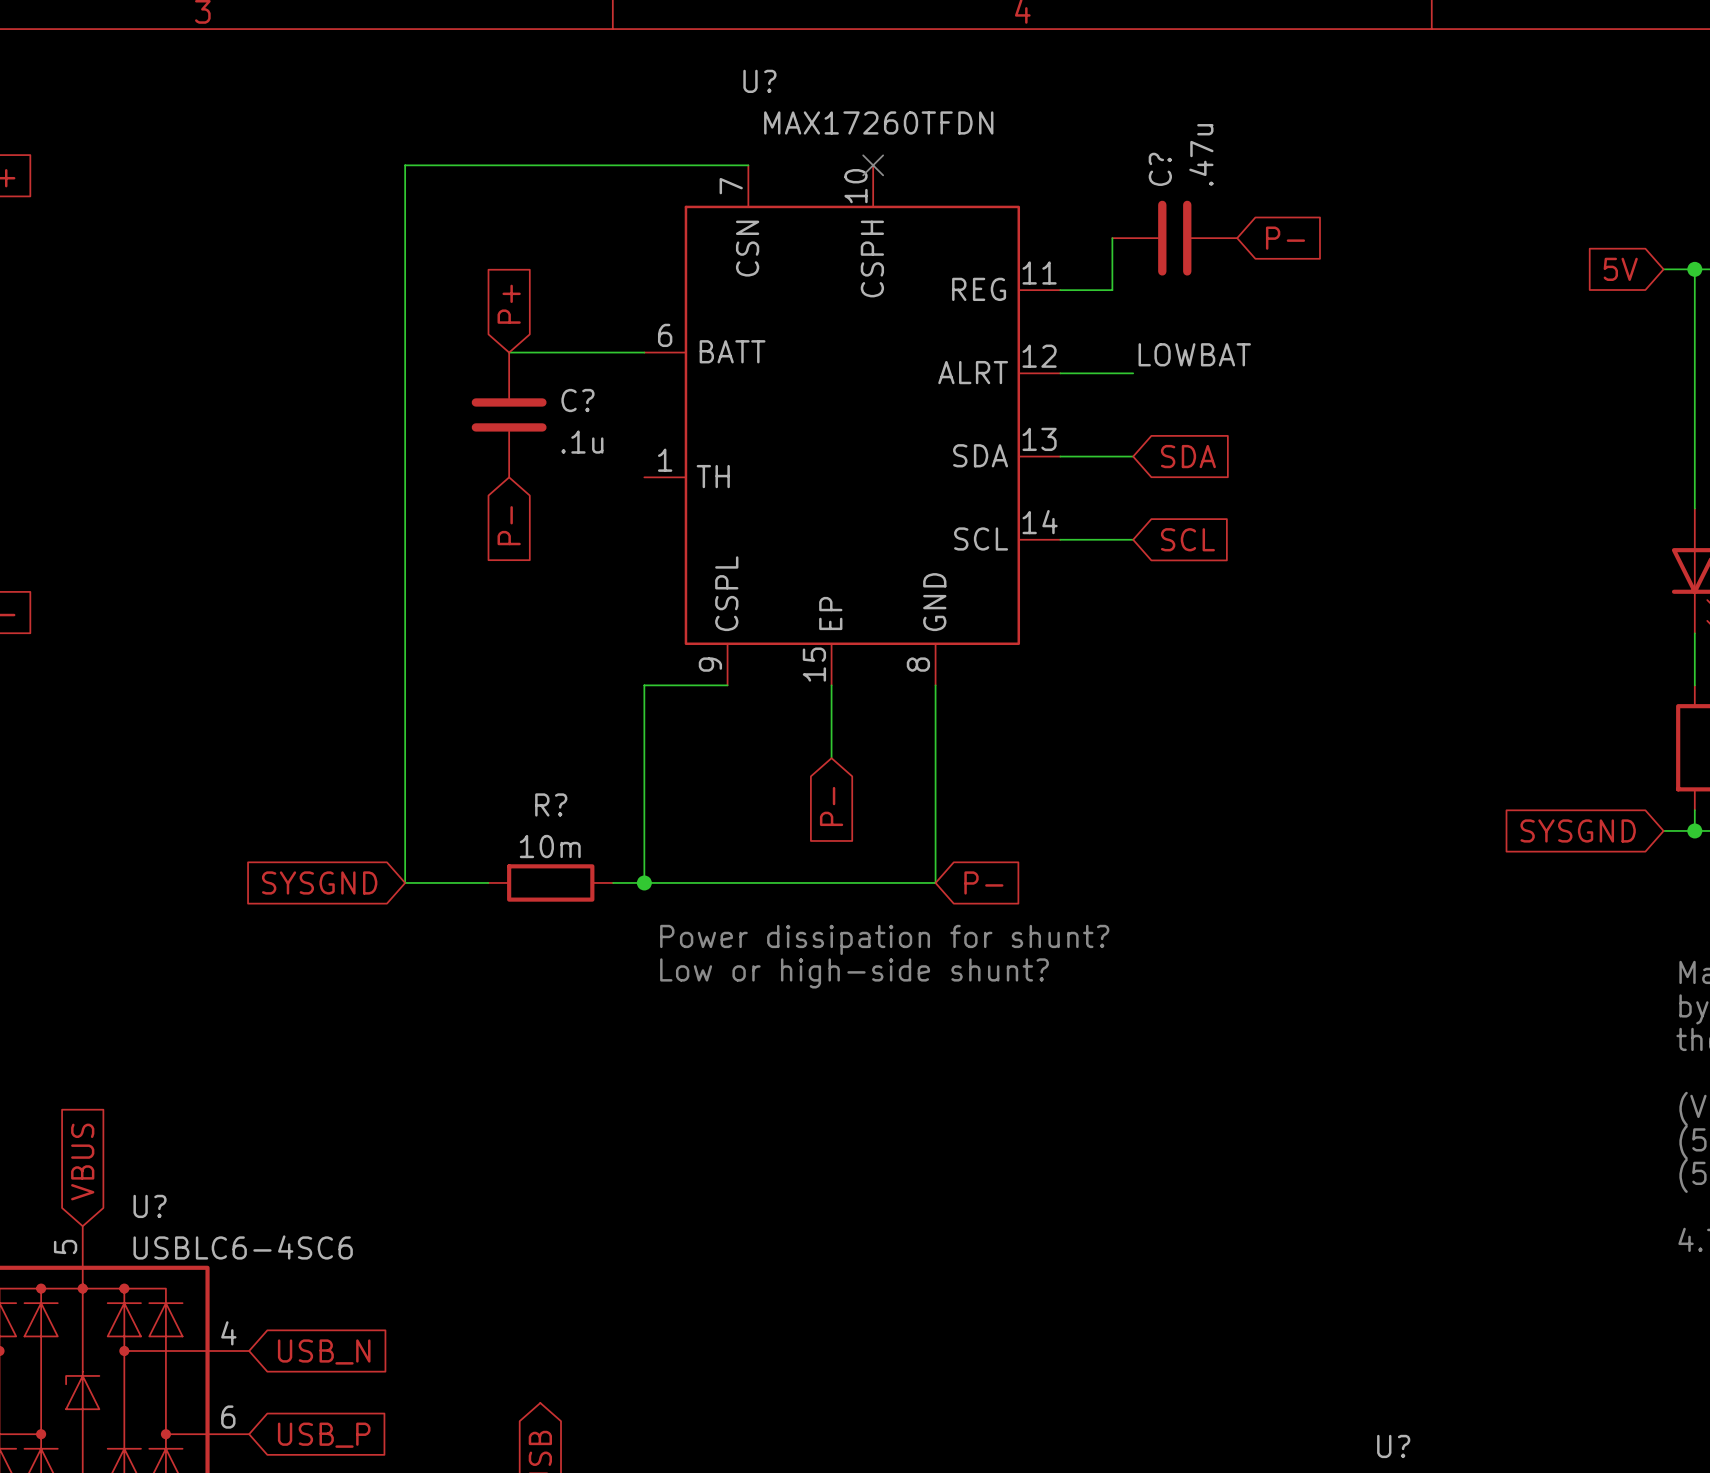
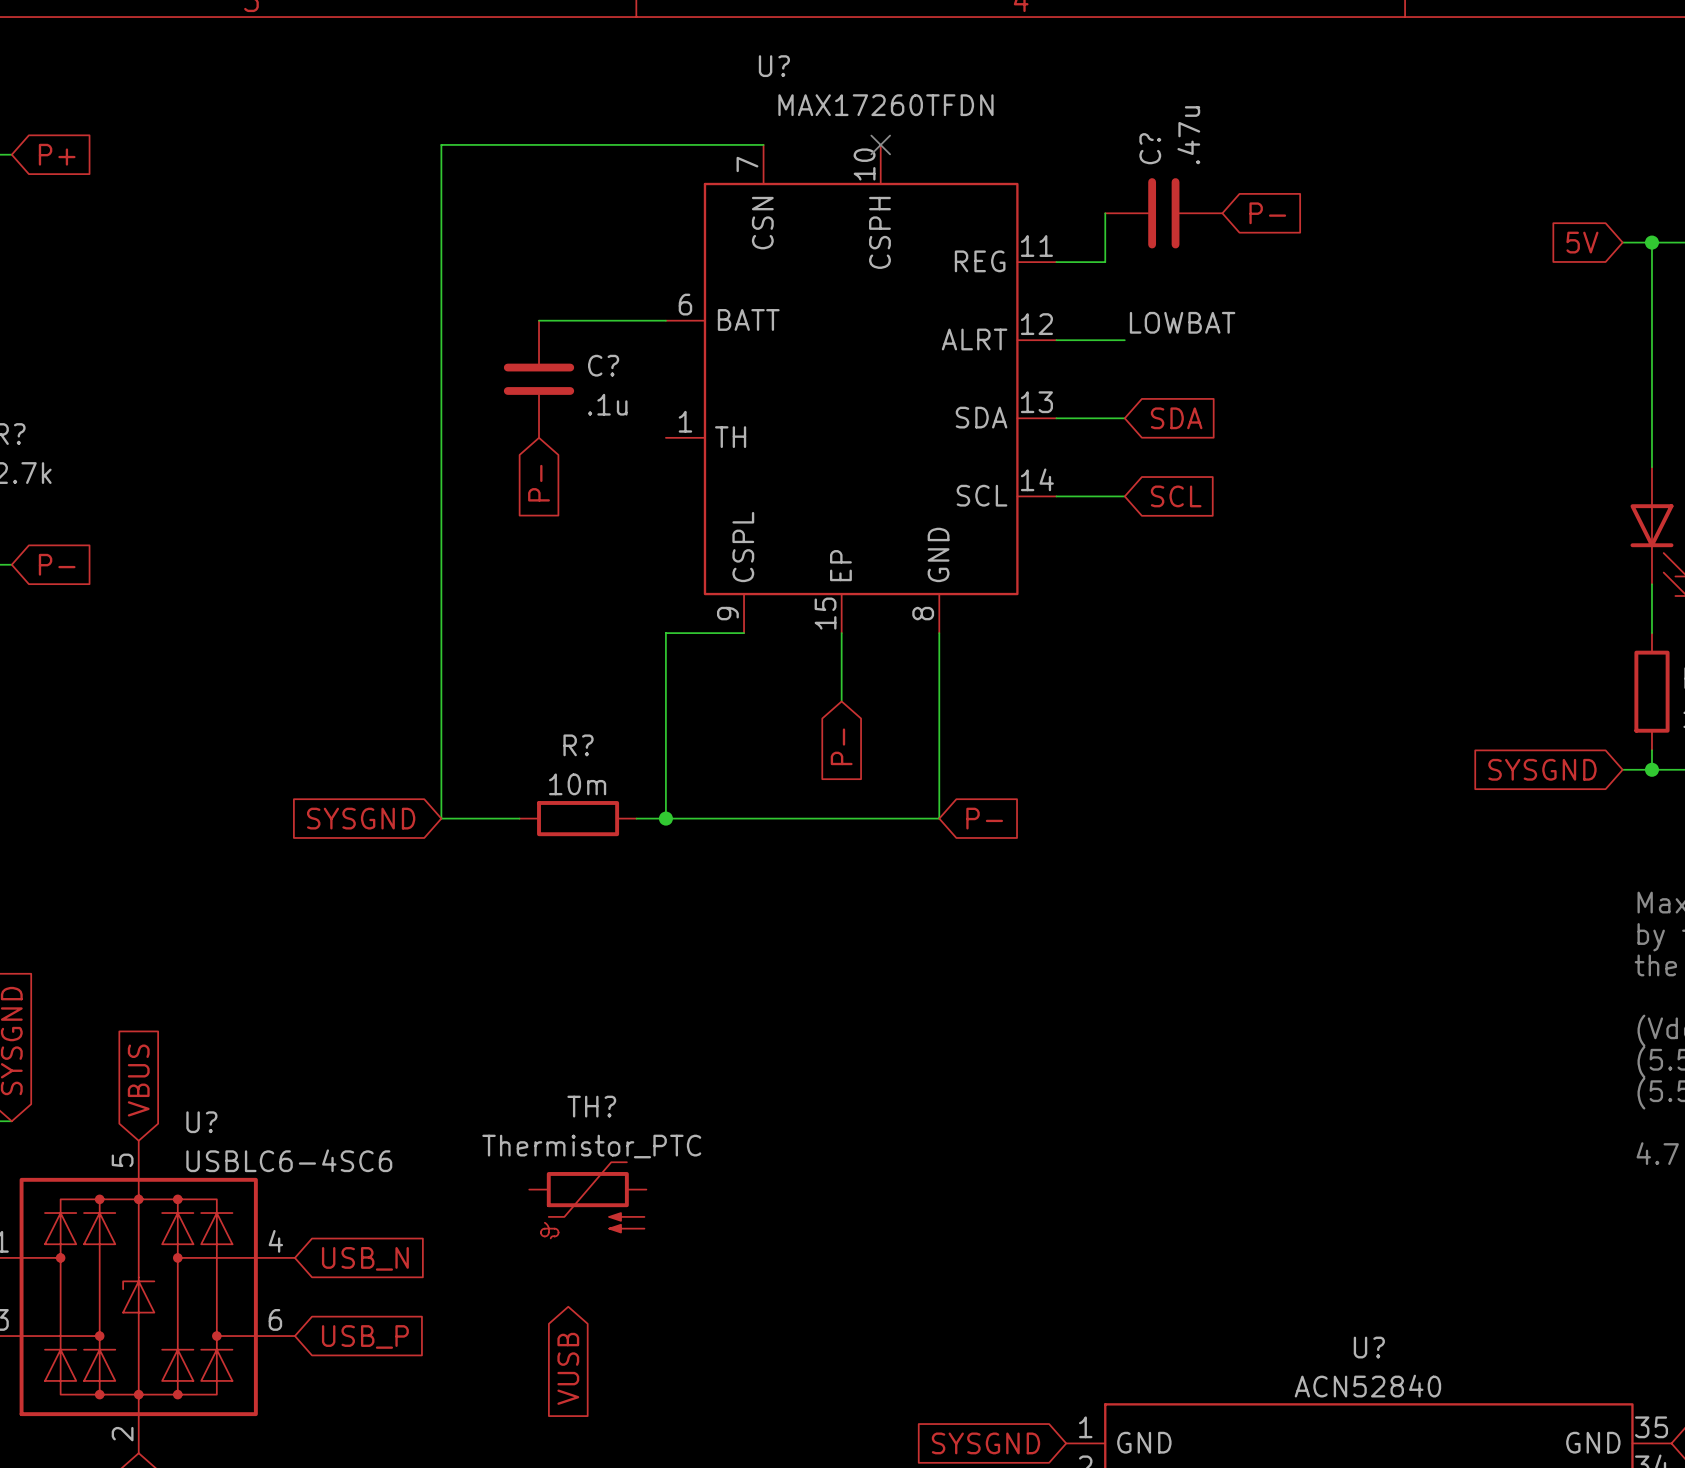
global label: P+ (509, 304) -> none
text: Power dissipation for shunt? (884, 939) -> none
text: Low or high-side shunt? (854, 973) -> none
TH?: none -> Thermistor_PTC (587, 1200)

